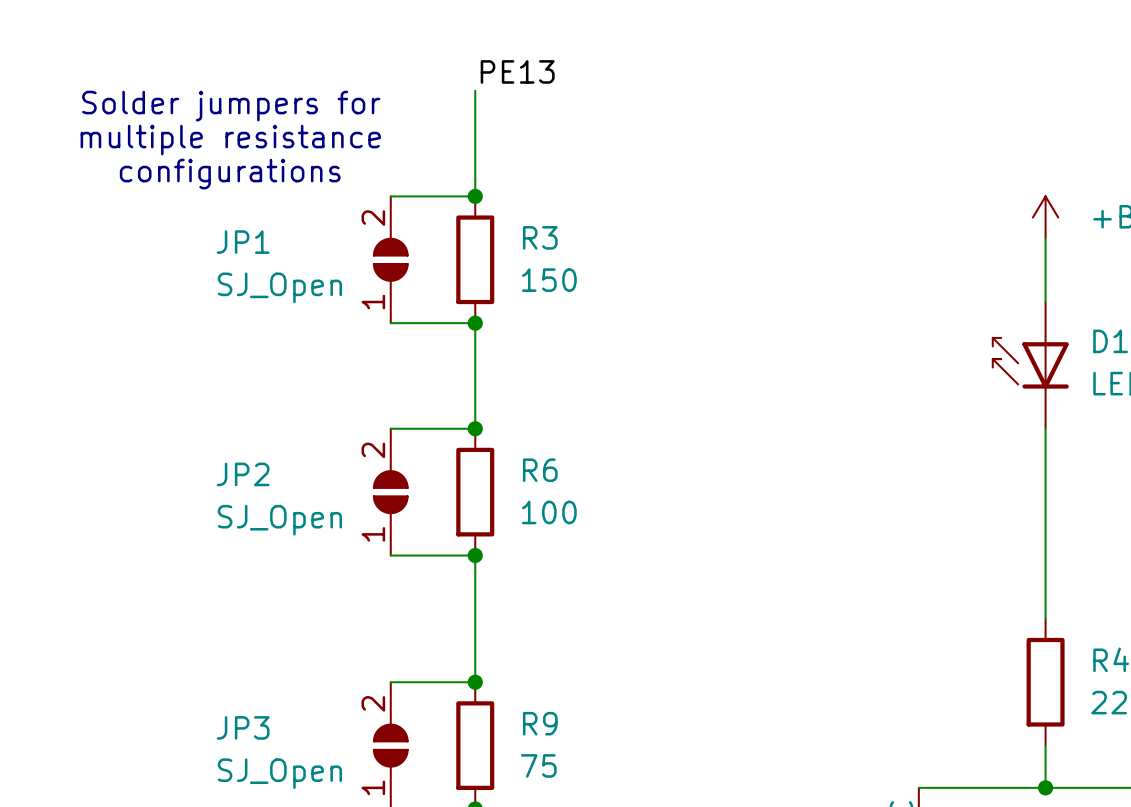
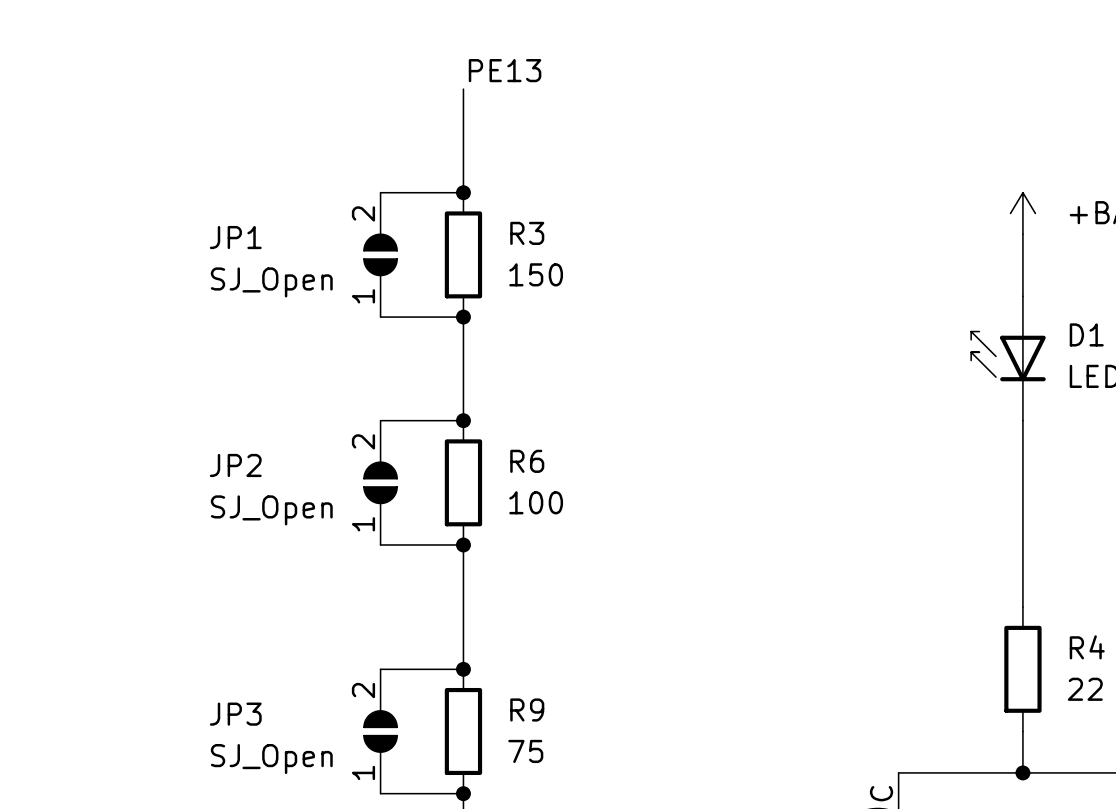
text: Solder jumpers for (231, 106) -> none
text: multiple resistance (230, 140) -> none
text: configurations (230, 174) -> none

